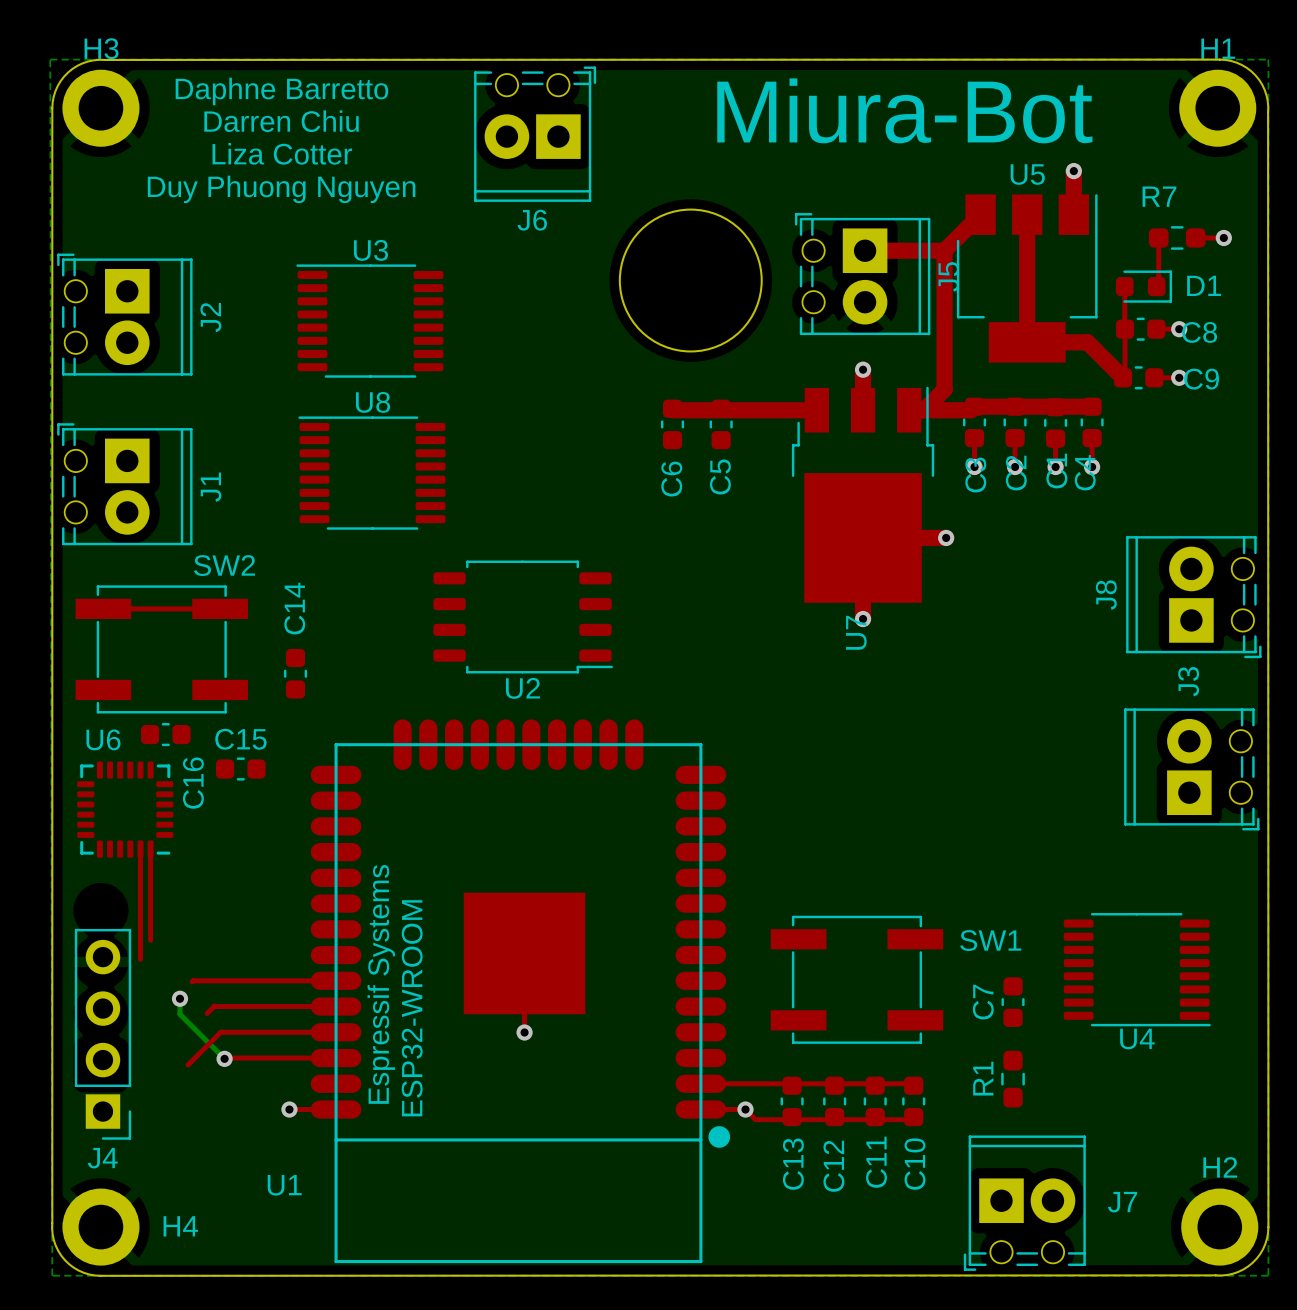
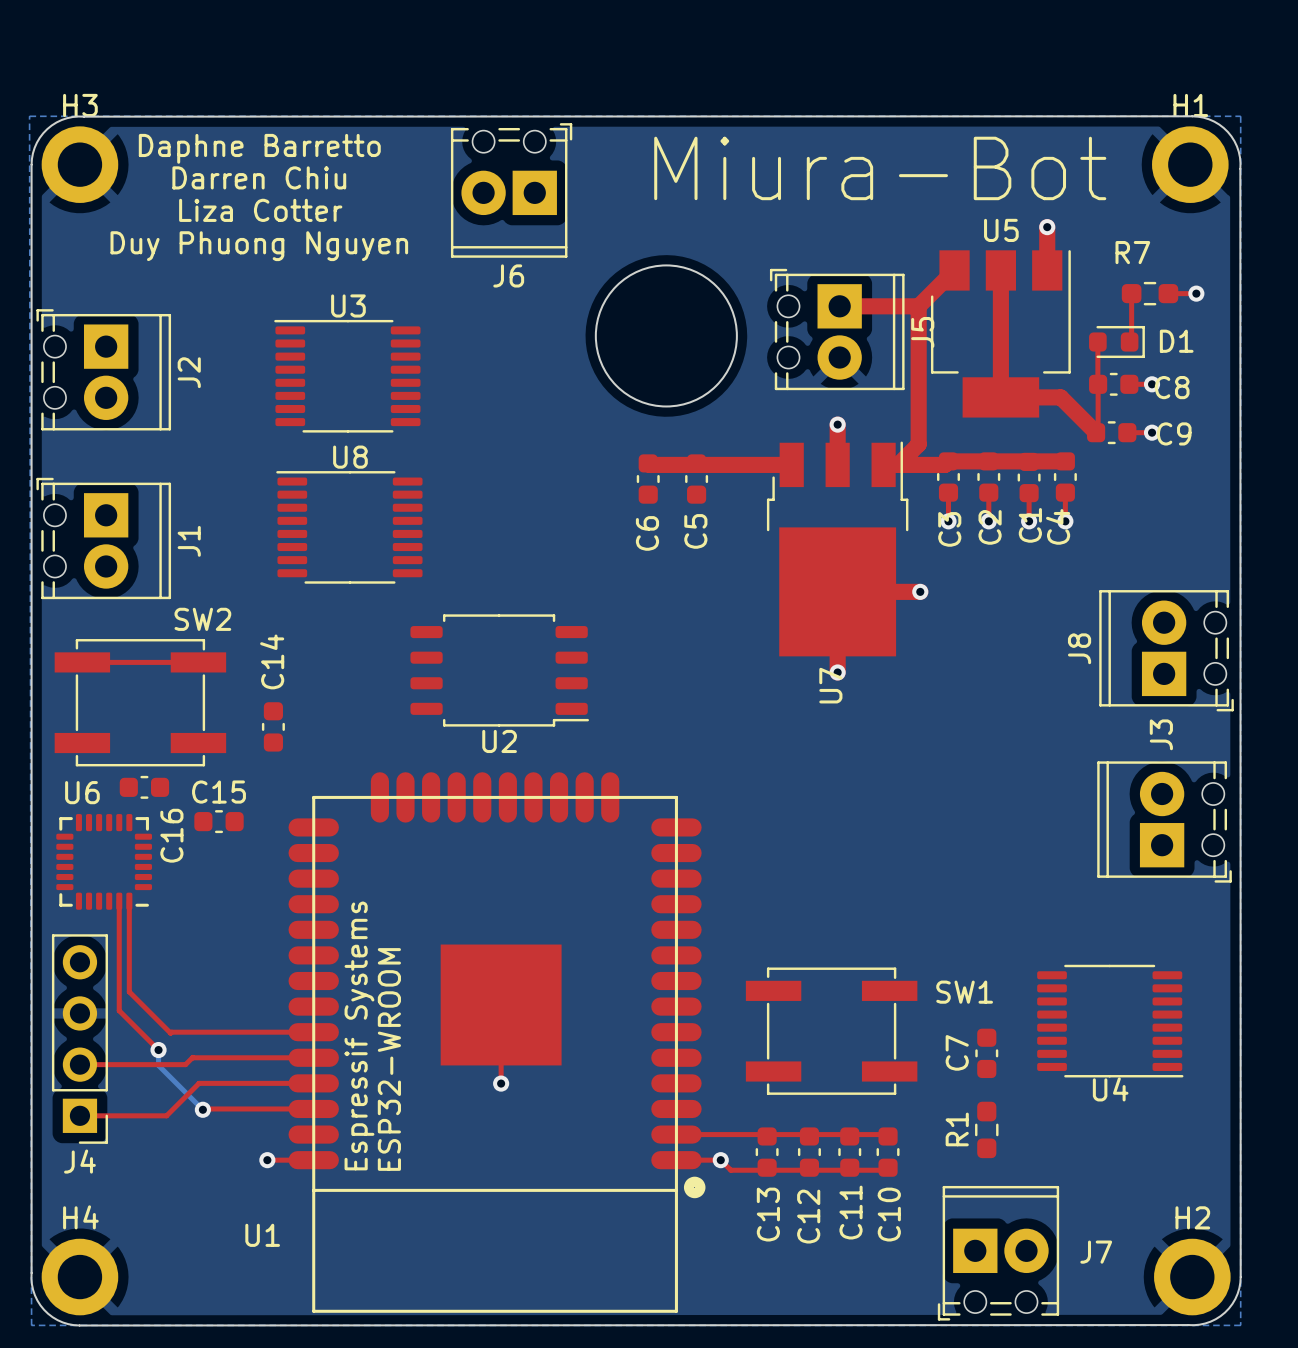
top track: none -> (129, 991) (170, 1033)
top track: none -> (119, 1010) (158, 1050)
top track: none -> (79, 1064) (185, 1064)
J4 position: (102, 1034) -> (79, 1039)
top track: none -> (79, 1115) (166, 1115)
H4 name position: H4 (180, 1226) -> H4 (80, 1217)

